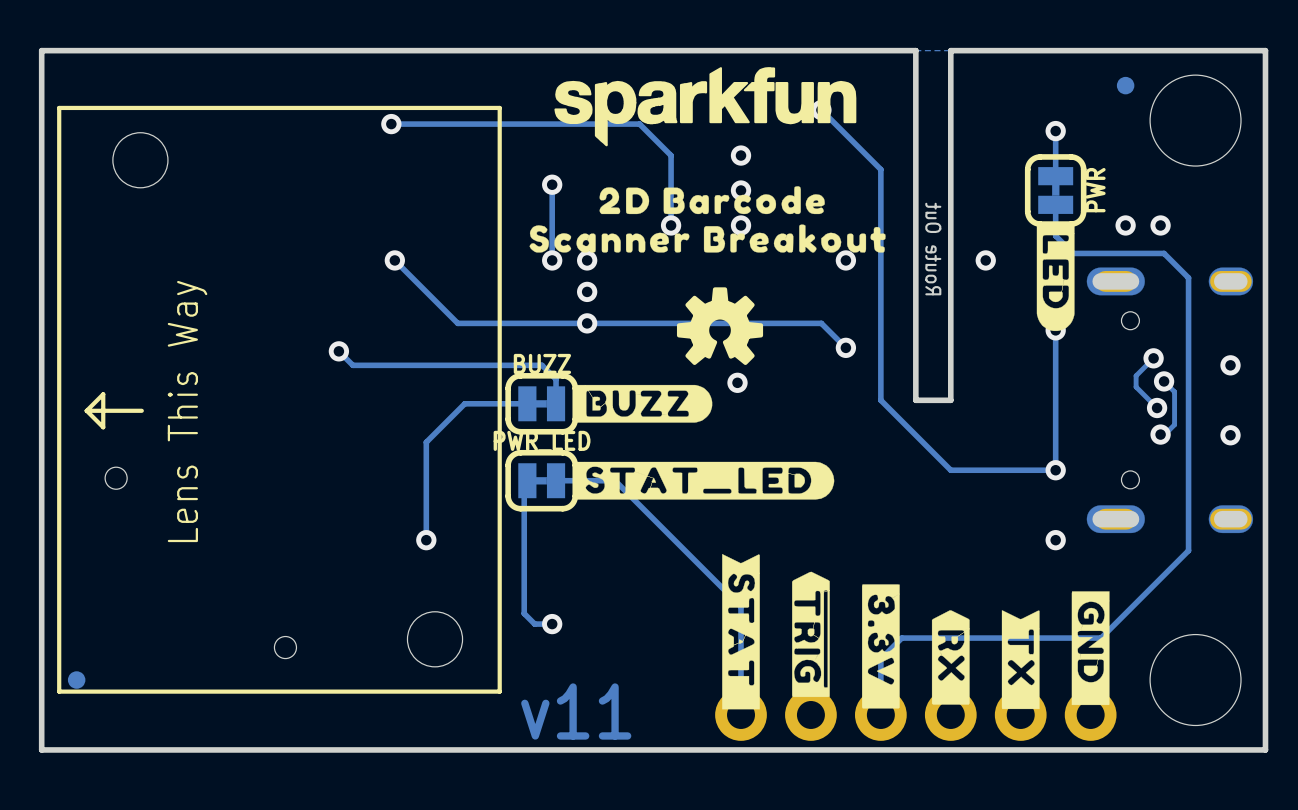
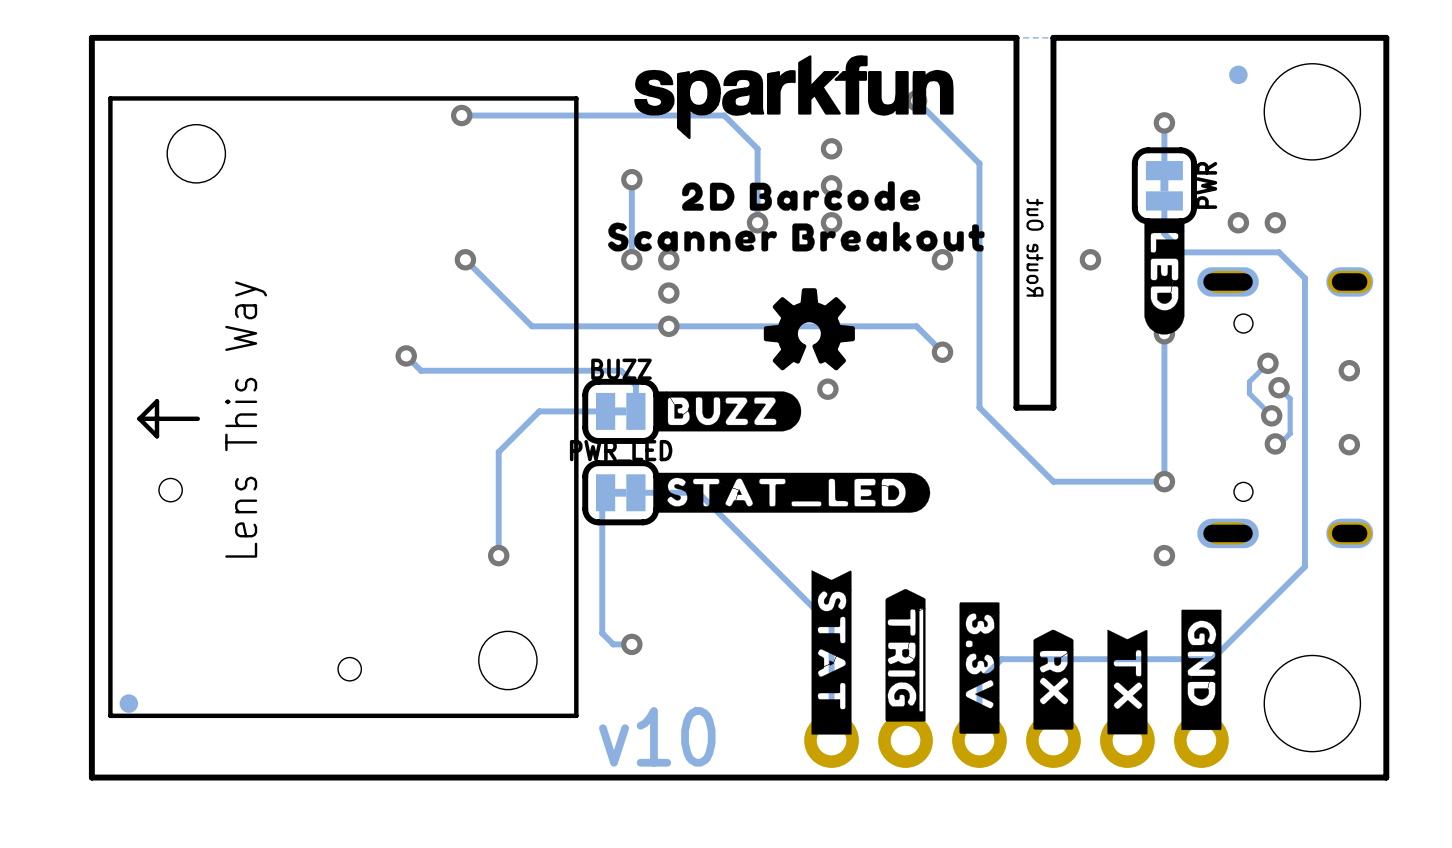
text: v11 (576, 711) -> v10 (657, 736)

